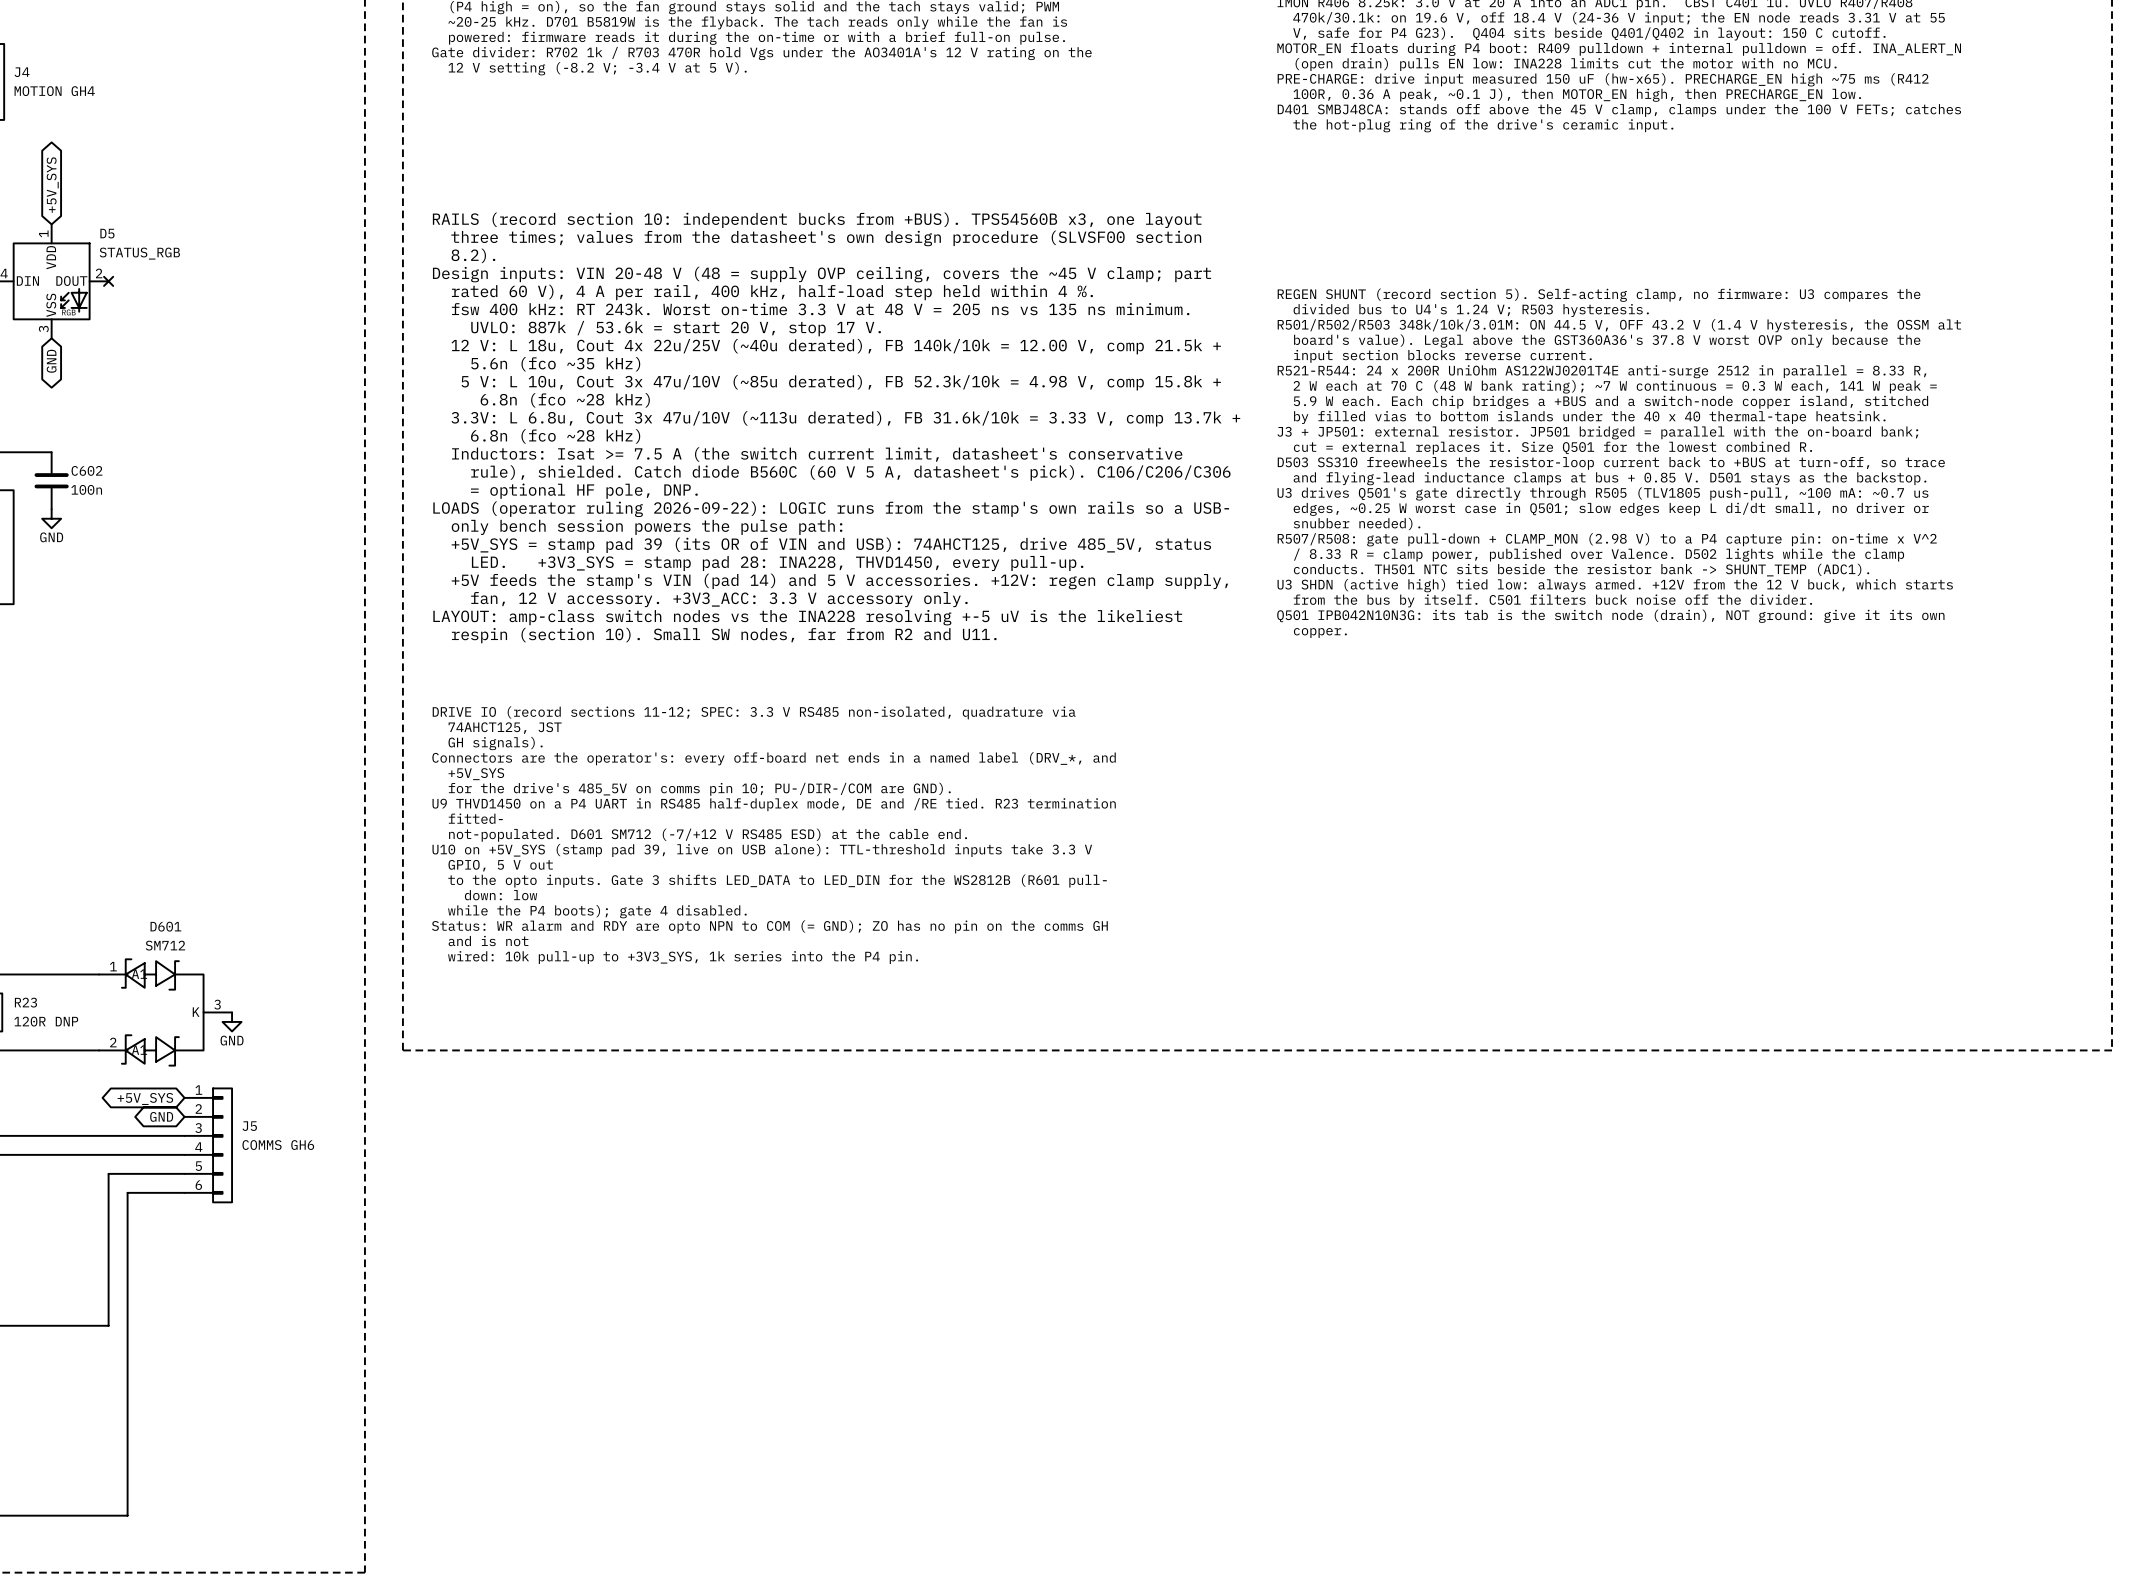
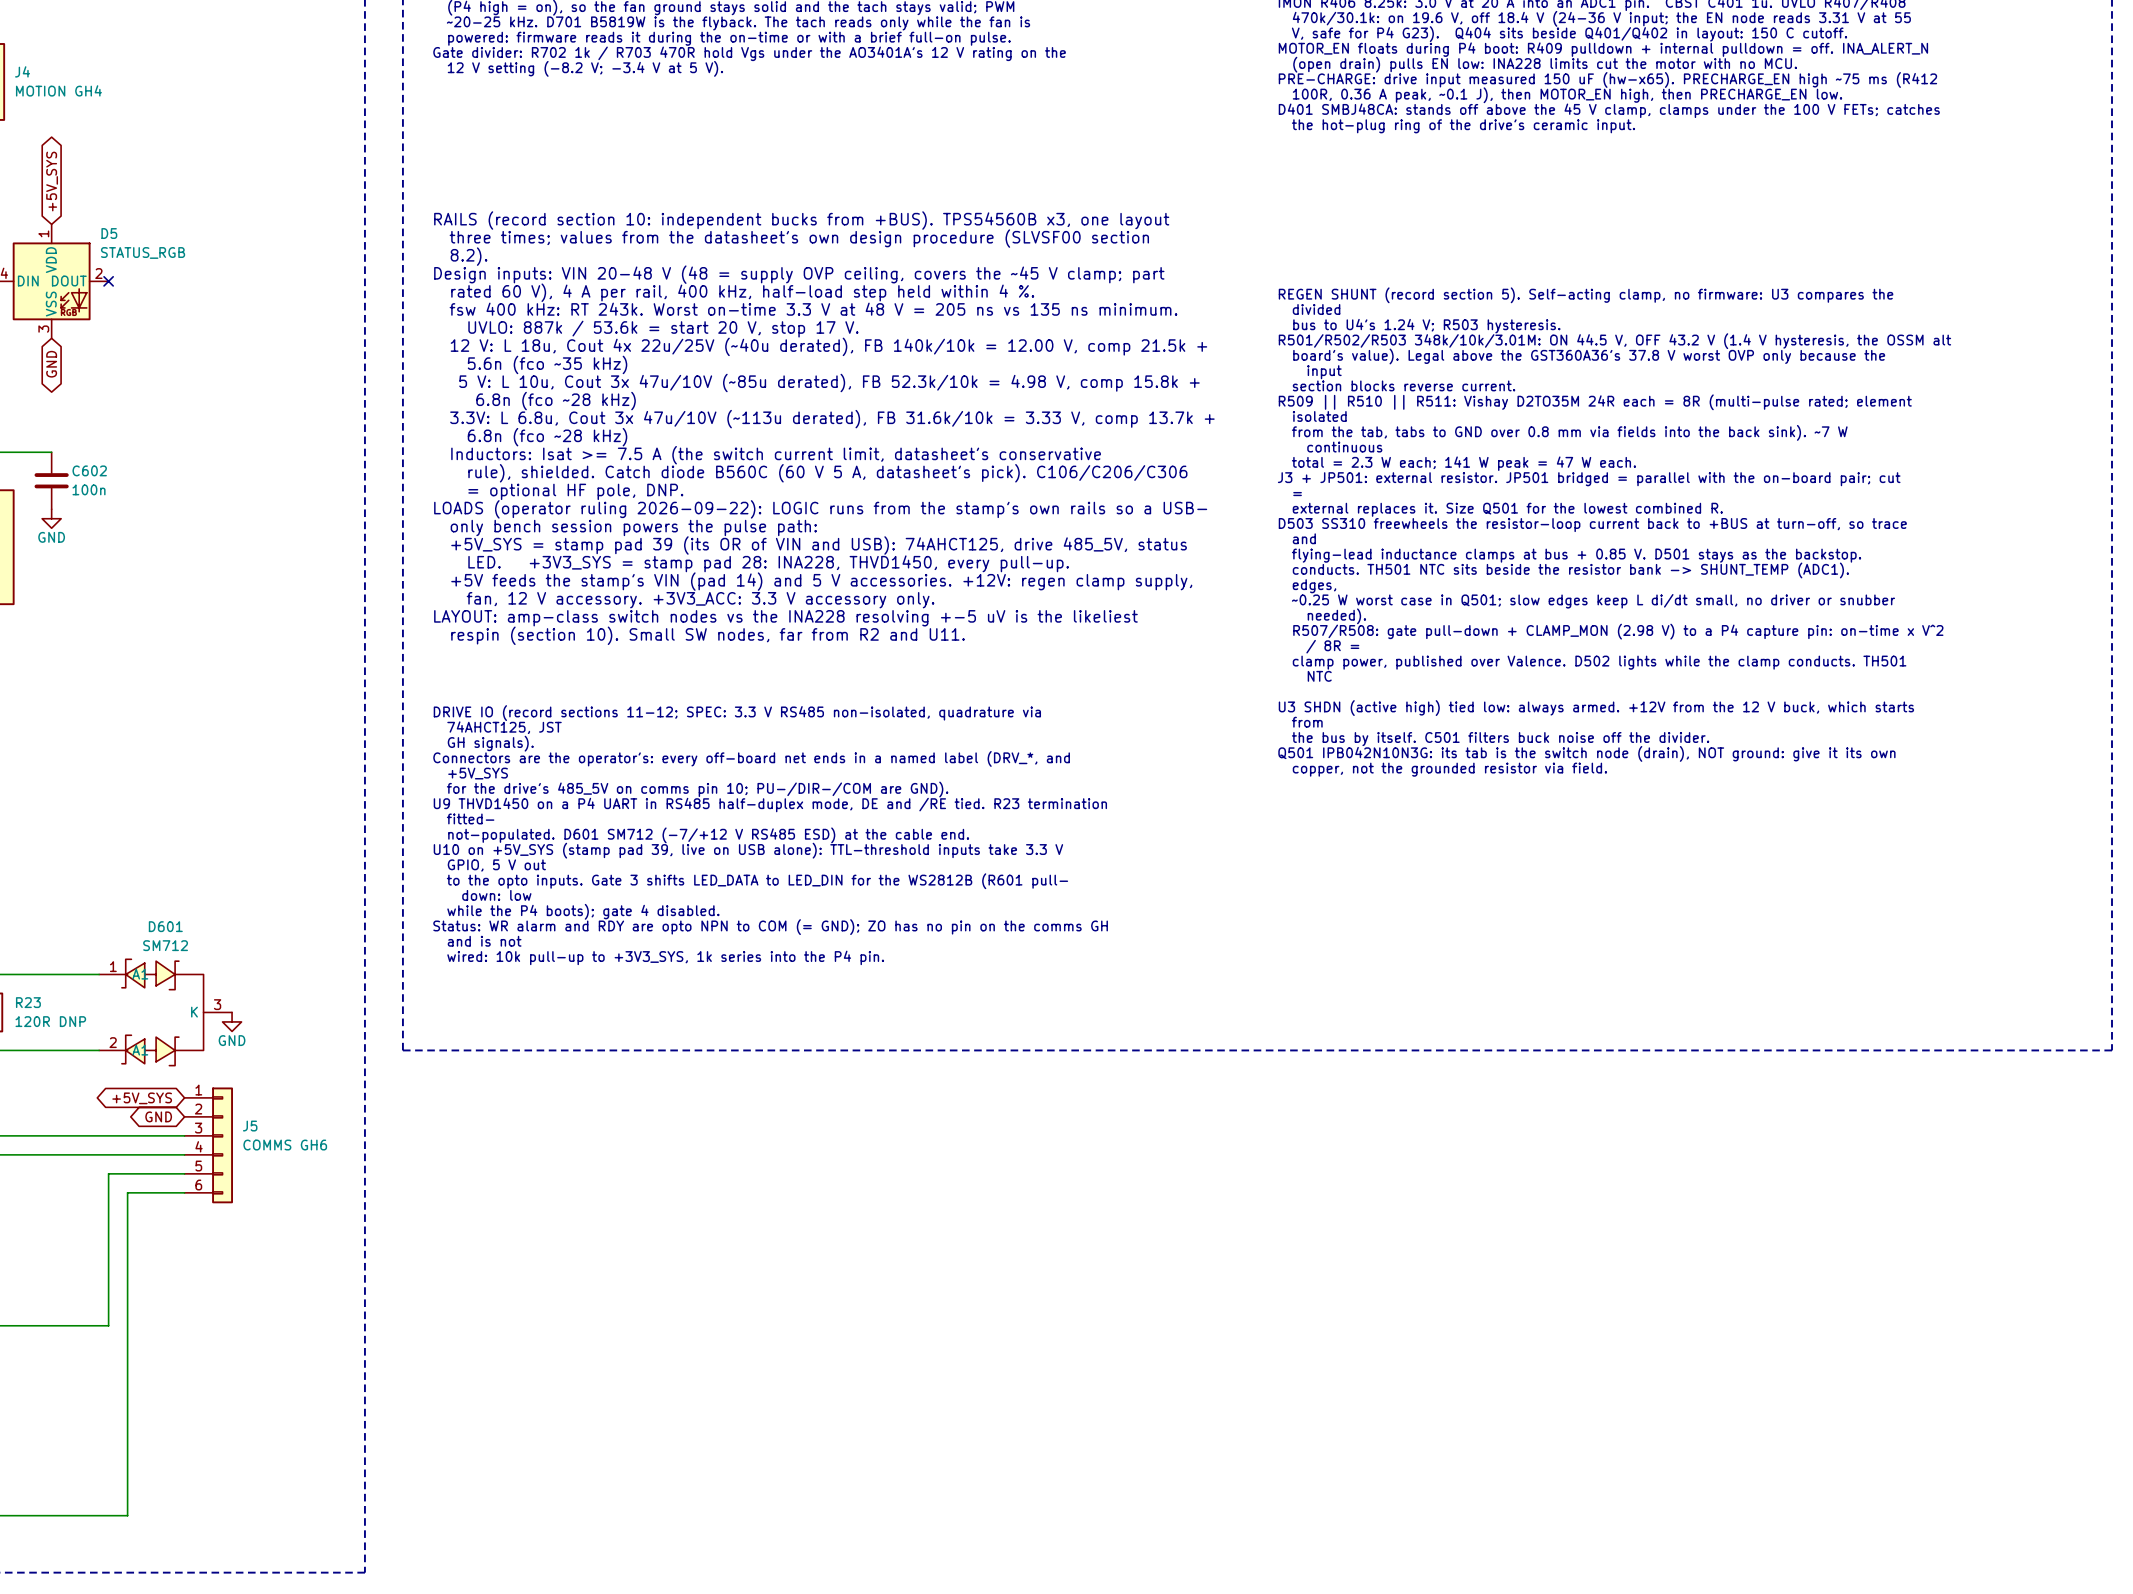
text: divided bus to U4's 1.24 V; R503 hysteresis. (1471, 310) -> divided (1316, 309)
text: R501/R502/R503 348k/10k/3.01M: ON 44.5 V, OFF 43.2 V (1.4 V hysteresis, the OSSM alt (1619, 325) -> bus to U4's 1.24 V; R503 hysteresis. (1426, 326)
text: board's value). Legal above the GST360A36's 37.8 V worst OVP only because the (1607, 341) -> R501/R502/R503 348k/10k/3.01M: ON 44.5 V, OFF 43.2 V (1.4 V hysteresis, the OSSM alt (1614, 341)
text: input section blocks reverse current. (1442, 356) -> board's value). Legal above the GST360A36's 37.8 V worst OVP only because the (1589, 356)
text: R521-R544: 24 x 200R UniOhm AS122WJ0201T4E anti-surge 2512 in parallel = 8.33 R, (1602, 371) -> input (1324, 372)
text: 2 W each at 70 C (48 W bank rating); ~7 W continuous = 0.3 W each, 141 W peak = (1615, 386) -> section blocks reverse current. (1404, 385)
text: 5.9 W each. Each chip bridges a +BUS and a switch-node copper island, stitched (1610, 402) -> R509 || R510 || R511: Vishay D2TO35M 24R each = 8R (multi-pulse rated; element (1595, 402)
text: by filled vias to bottom islands under the 40 x 40 thermal-tape heatsink. (1589, 417) -> isolated (1319, 416)
text: J3 + JP501: external resistor. JP501 bridged = parallel with the on-board bank; (1597, 432) -> from the tab, tabs to GND over 0.8 mm via fields into the back sink). ~7 W (1569, 432)
text: cut = external replaces it. Size Q501 for the lowest combined R. (1553, 448) -> continuous (1344, 447)
text: D503 SS310 freewheels the resistor-loop current back to +BUS at turn-off, so trace (1611, 463) -> total = 2.3 W each; 141 W peak = 47 W each. (1463, 463)
text: and flying-lead inductance clamps at bus + 0.85 V. D501 stays as the backstop. (1610, 478) -> J3 + JP501: external resistor. JP501 bridged = parallel with the on-board pair; cut (1589, 479)
text: U3 drives Q501's gate directly through R505 (TLV1805 push-pull, ~100 mA: ~0.7 us (1602, 493) -> = (1297, 494)
text: edges, ~0.25 W worst case in Q501; slow edges keep L di/dt small, no driver or (1611, 509) -> external replaces it. Size Q501 for the lowest combined R. (1507, 509)
text: snubber needed). (1357, 524) -> D503 SS310 freewheels the resistor-loop current back to +BUS at turn-off, so trace (1592, 525)
text: R507/R508: gate pull-down + CLAMP_MON (2.98 V) to a P4 capture pin: on-time x V^2 (1607, 539) -> and (1304, 538)
text: / 8.33 R = clamp power, published over Valence. D502 lights while the clamp (1599, 555) -> flying-lead inductance clamps at bus + 0.85 V. D501 stays as the backstop. (1576, 555)
text: U3 SHDN (active high) tied low: always armed. +12V from the 12 V buck, which starts (1615, 585) -> edges, (1314, 586)
text: from the bus by itself. C501 filters buck noise off the divider. (1552, 600) -> ~0.25 W worst case in Q501; slow edges keep L di/dt small, no driver or snubber (1593, 601)
text: Q501 IPB042N10N3G: its tab is the switch node (drain), NOT ground: give it its own (1610, 616) -> needed). (1336, 616)
text: copper. (1320, 633) -> R507/R508: gate pull-down + CLAMP_MON (2.98 V) to a P4 capture pin: on-time x V^2 (1618, 631)
text: none -> / 8R = (1332, 646)
text: none -> clamp power, published over Valence. D502 lights while the clamp conducts. TH501 (1599, 662)
text: none -> NTC (1319, 676)
text: none -> U3 SHDN (active high) tied low: always armed. +12V from the 12 V buck, which starts (1596, 708)
text: none -> from (1307, 722)
text: none -> the bus by itself. C501 filters buck noise off the divider. (1500, 739)
text: none -> Q501 IPB042N10N3G: its tab is the switch node (drain), NOT ground: give it its own (1586, 753)
text: none -> copper, not the grounded resistor via field. (1449, 769)

